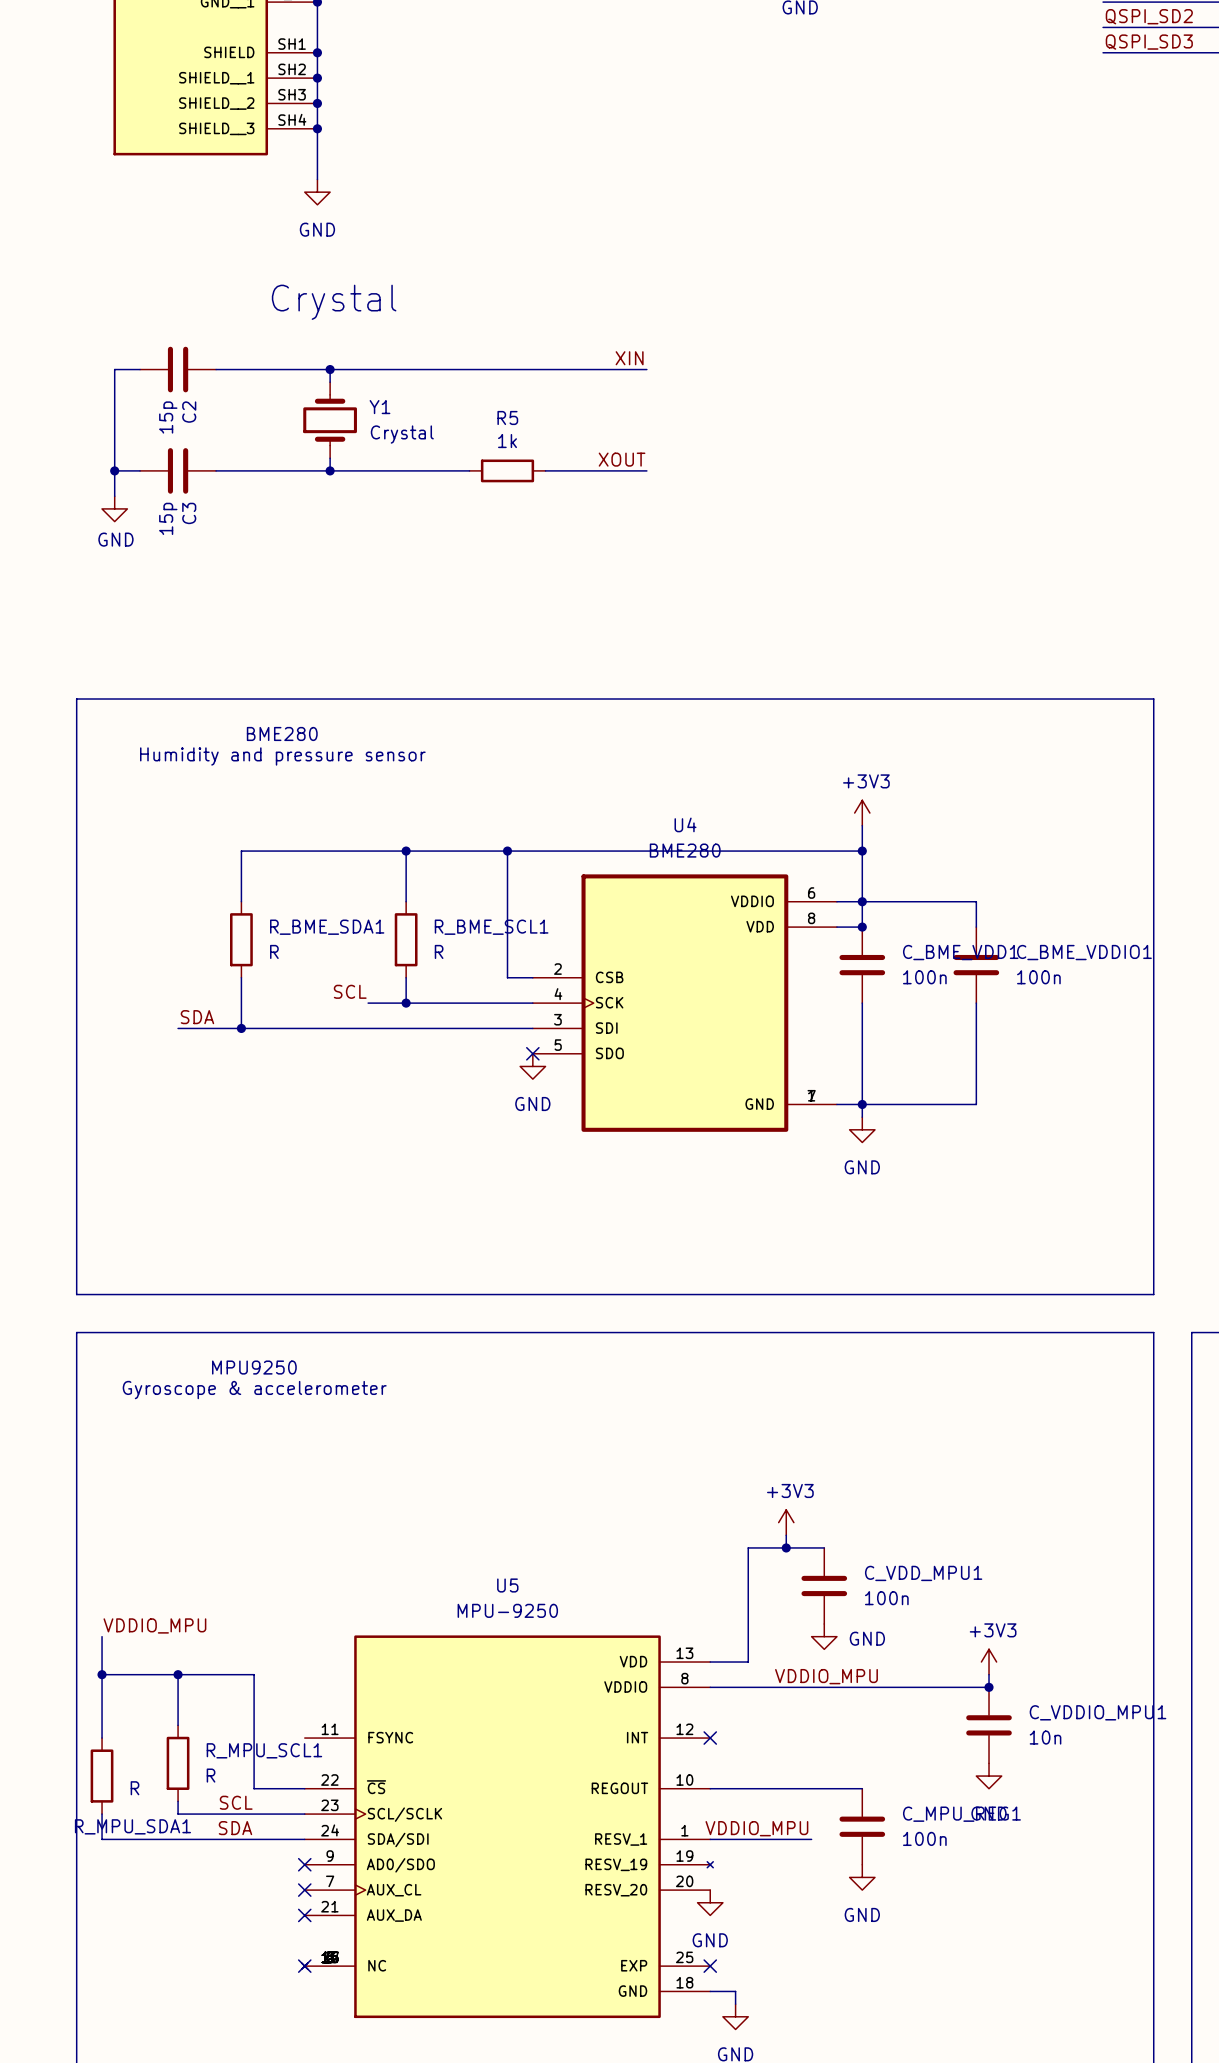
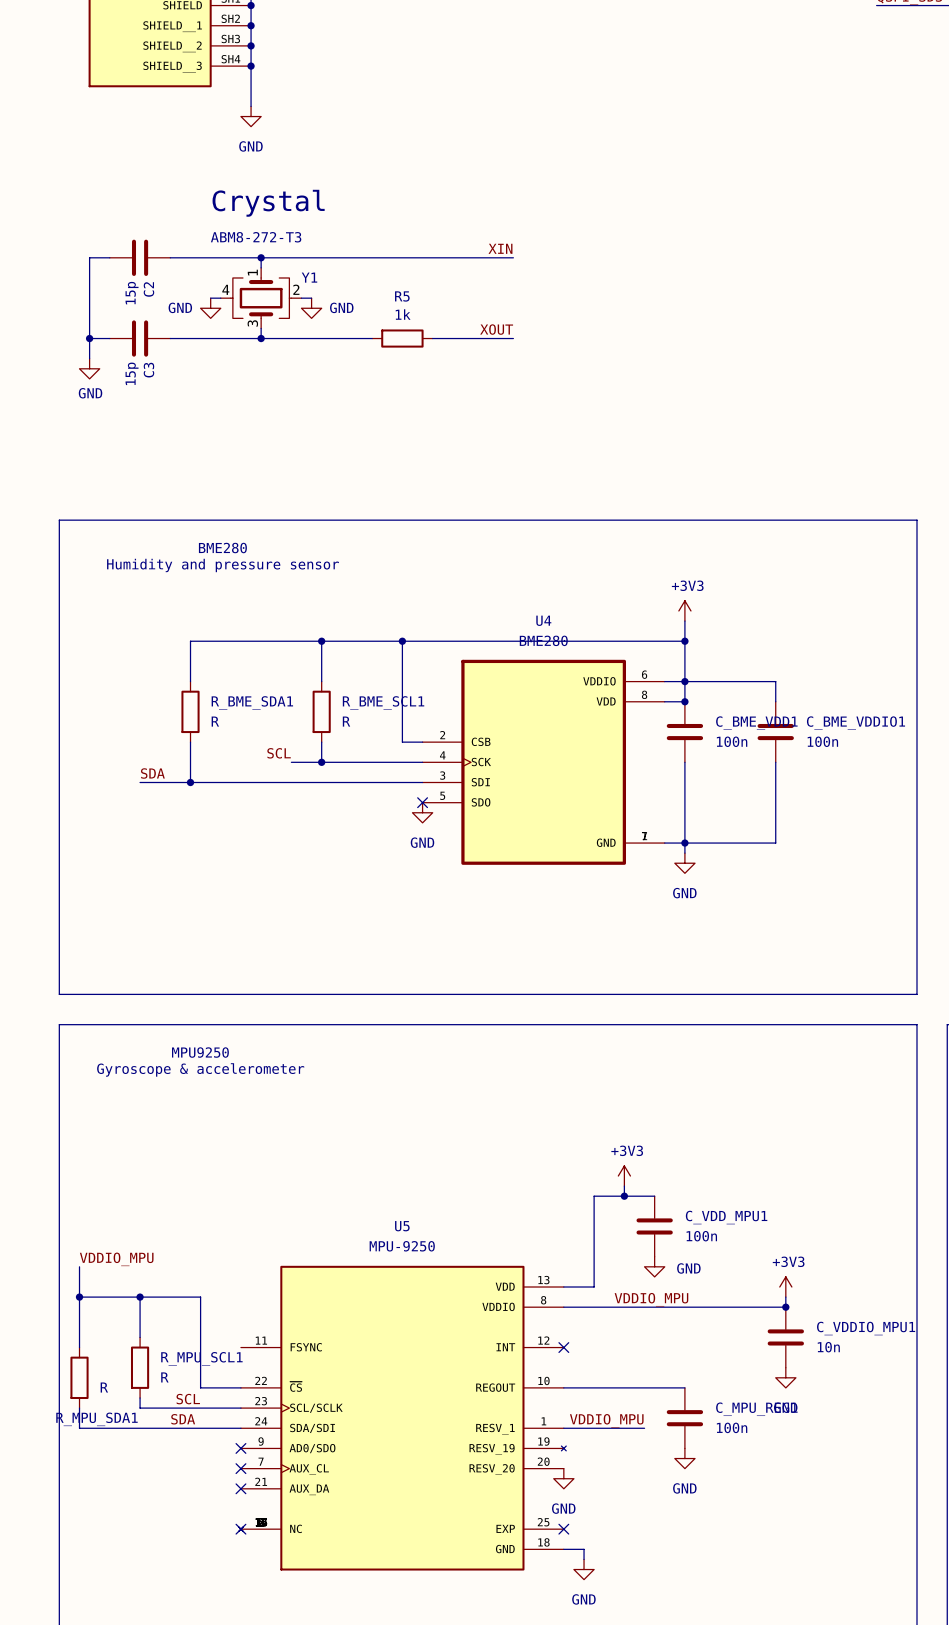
Y1 symbol: [303, 382, 357, 459] -> [220, 267, 302, 329]
wire: none -> (210, 298) (220, 298)
wire: none -> (301, 298) (311, 298)
power symbol: none -> GND (210, 308)
power symbol: none -> GND (311, 308)
Y1 value: Crystal (402, 434) -> ABM8-272-T3 (256, 237)

